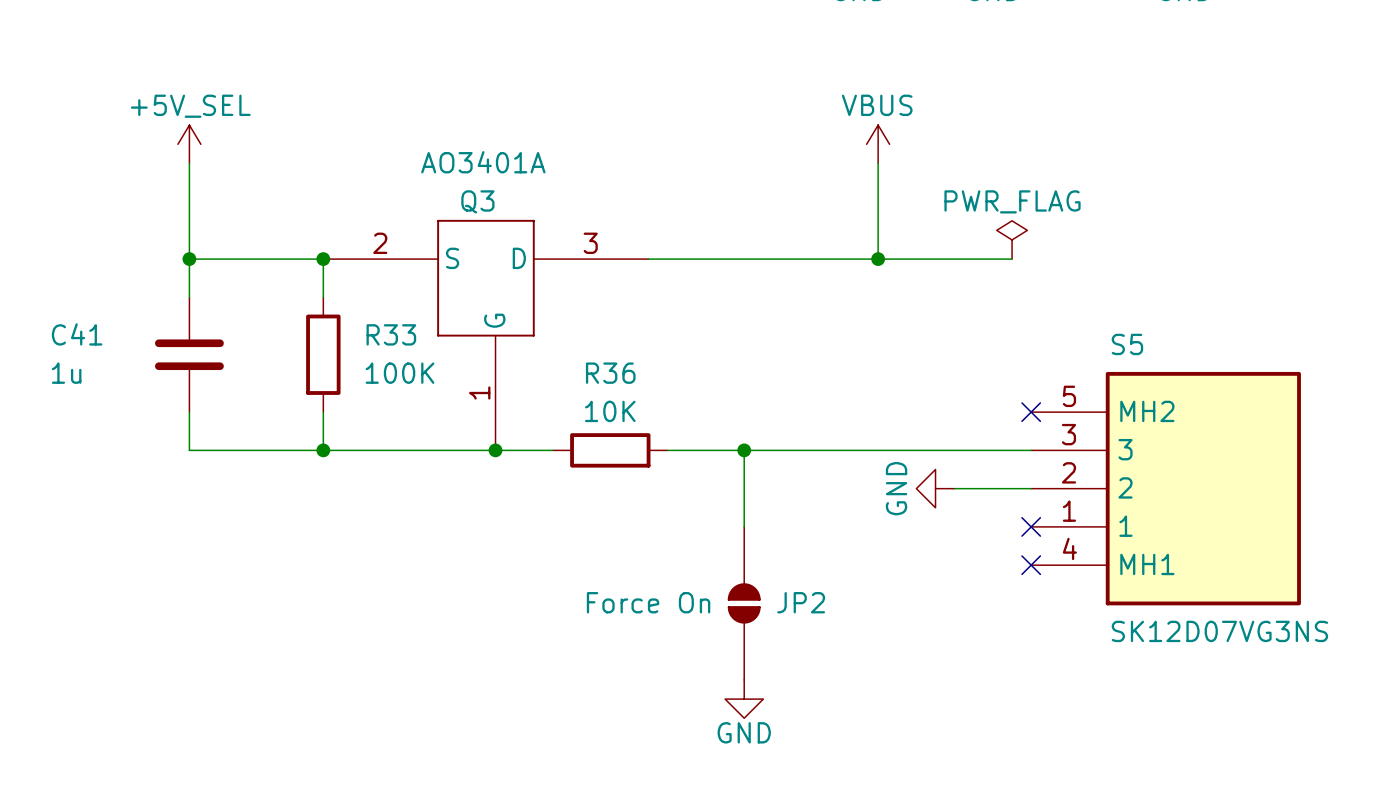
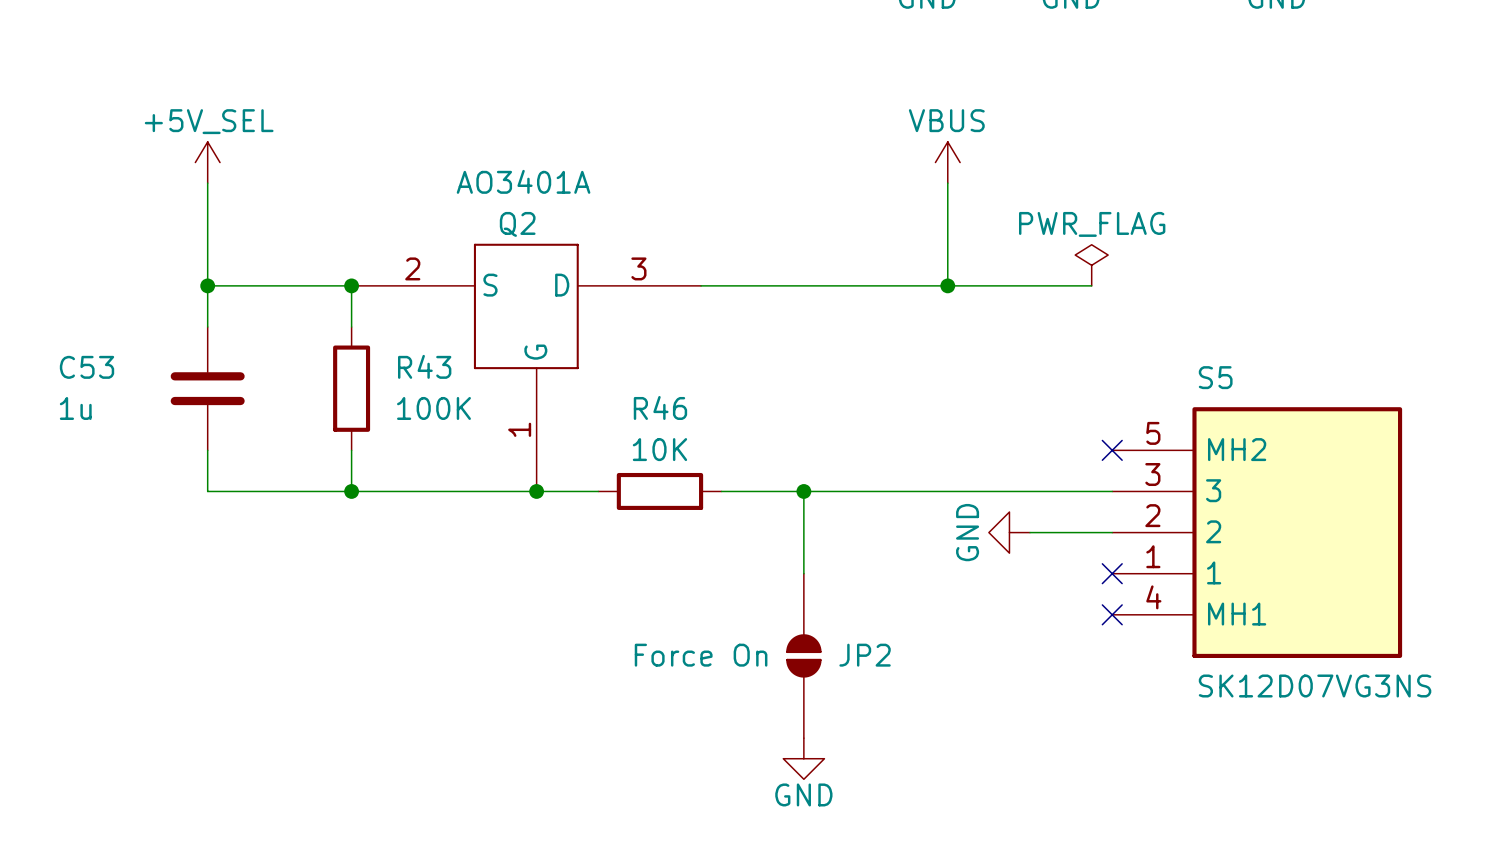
Q3 name: Q3 (477, 201) -> Q2 (517, 224)
C41 name: C41 (77, 334) -> C53 (87, 367)
R33 name: R33 (391, 334) -> R43 (424, 366)
R36 name: R36 (610, 373) -> R46 (660, 407)

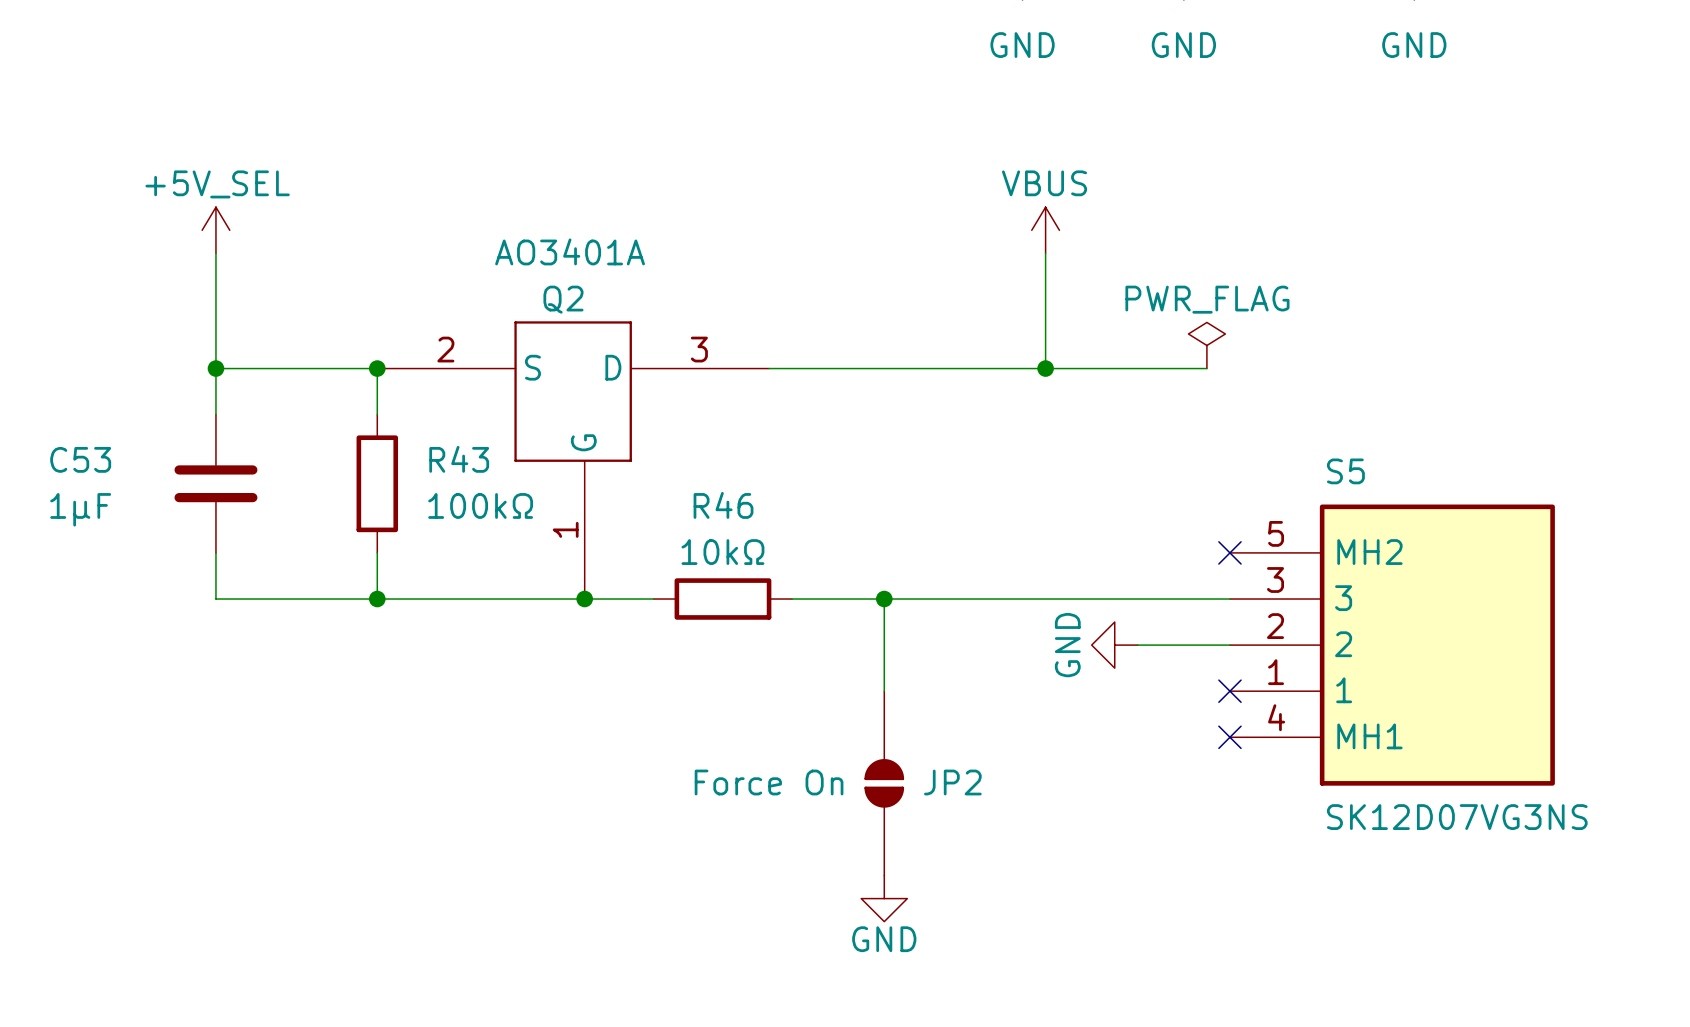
C53 value: 1u (75, 408) -> 1µF (80, 509)
R43 value: 100K (433, 408) -> 100kΩ (480, 505)
R46 value: 10K (659, 449) -> 10kΩ (722, 552)

